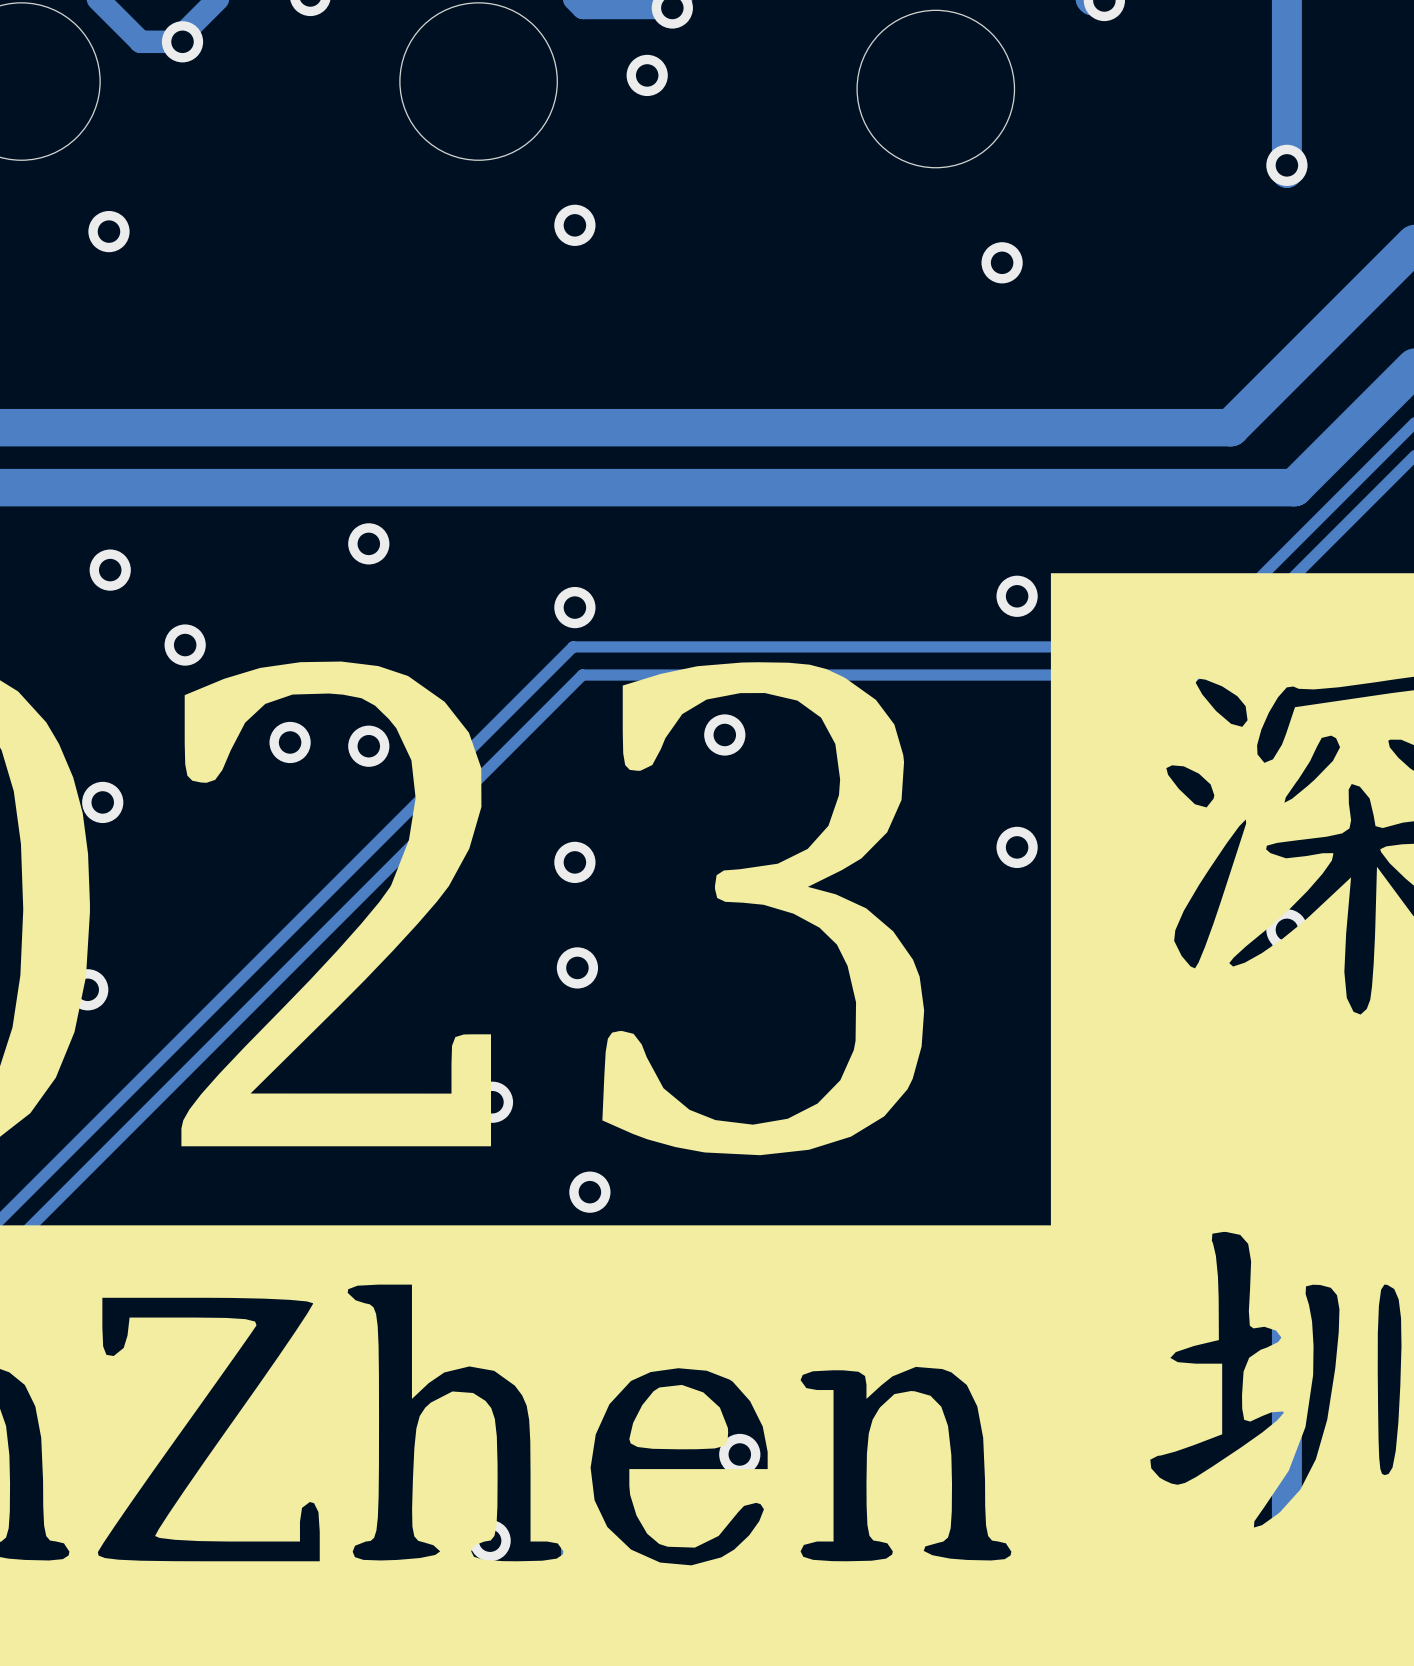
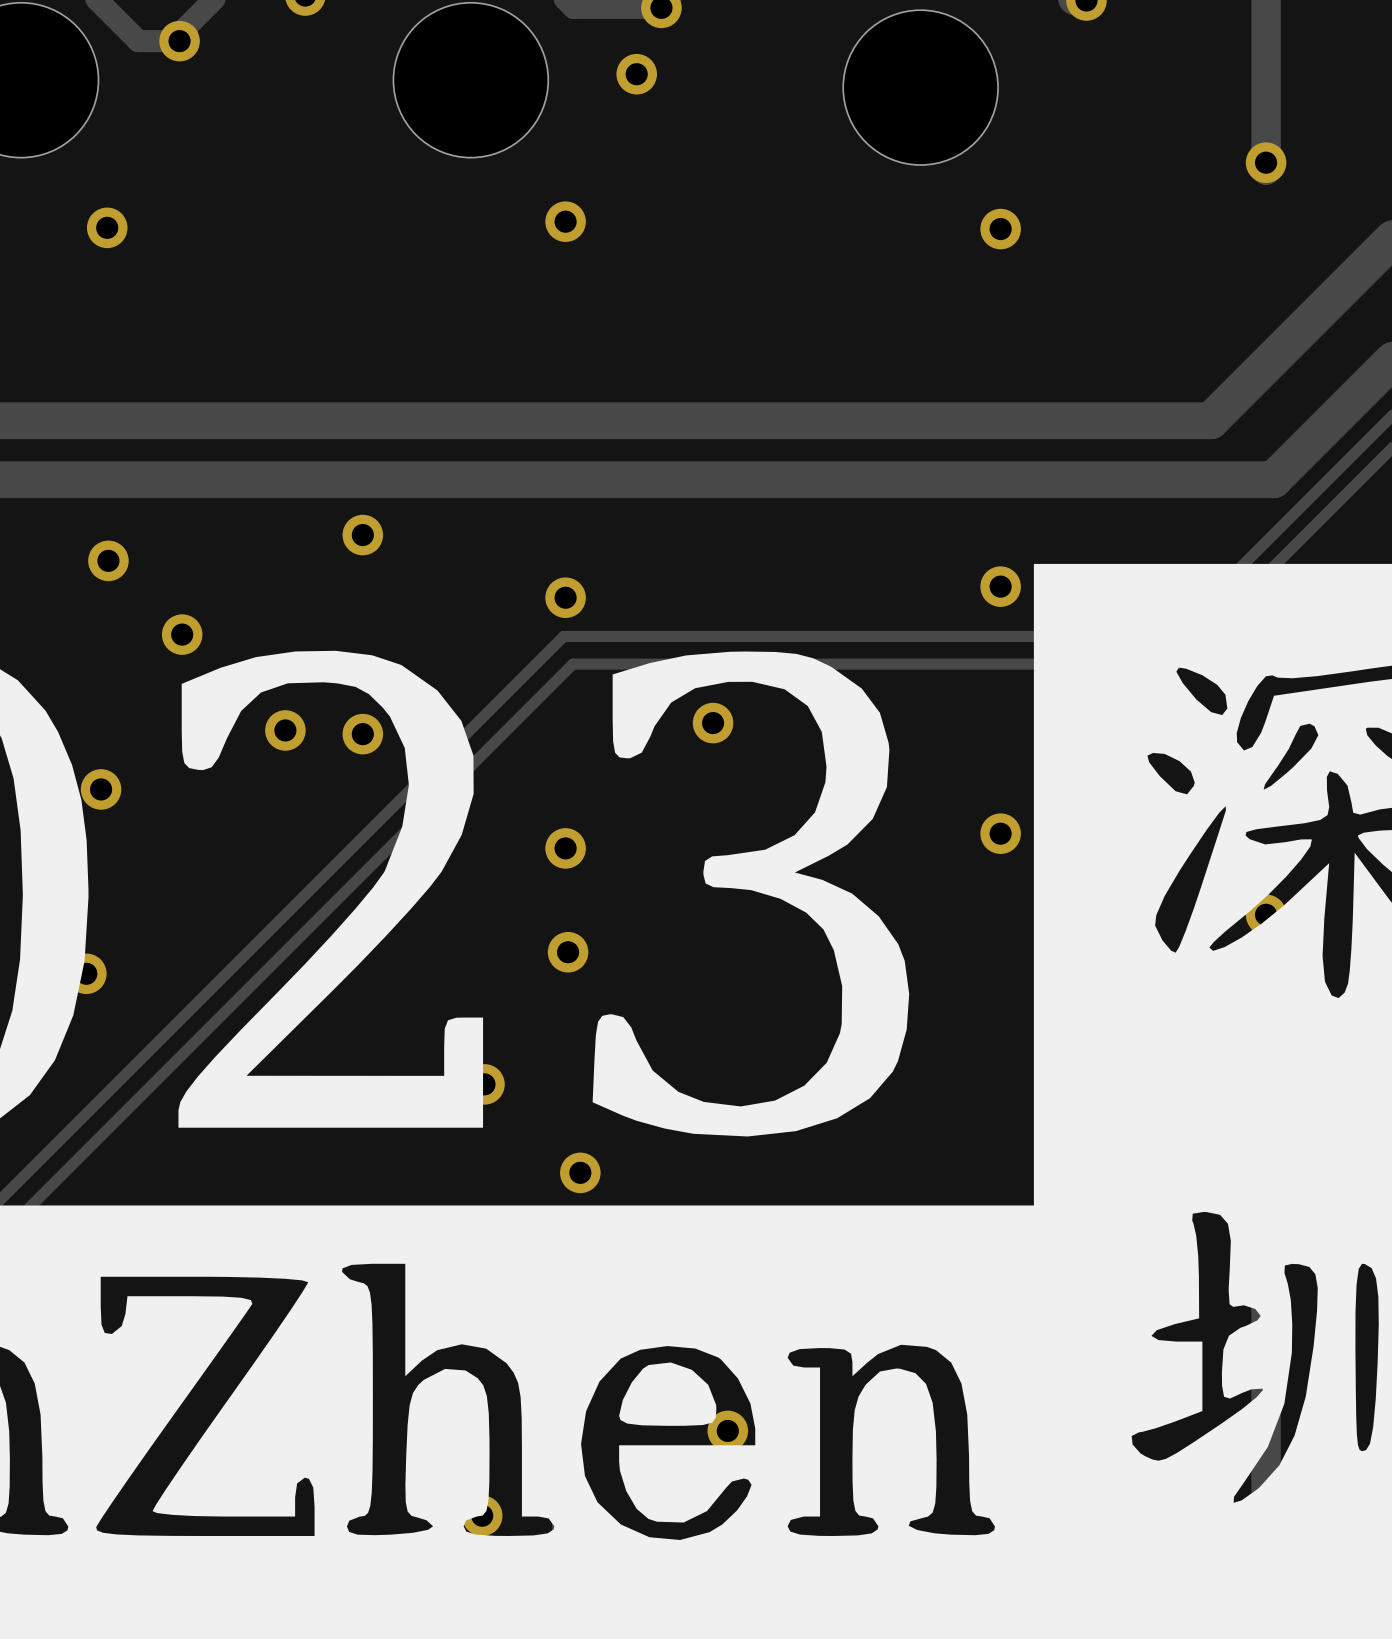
via position: (1002, 262) -> (1000, 229)

